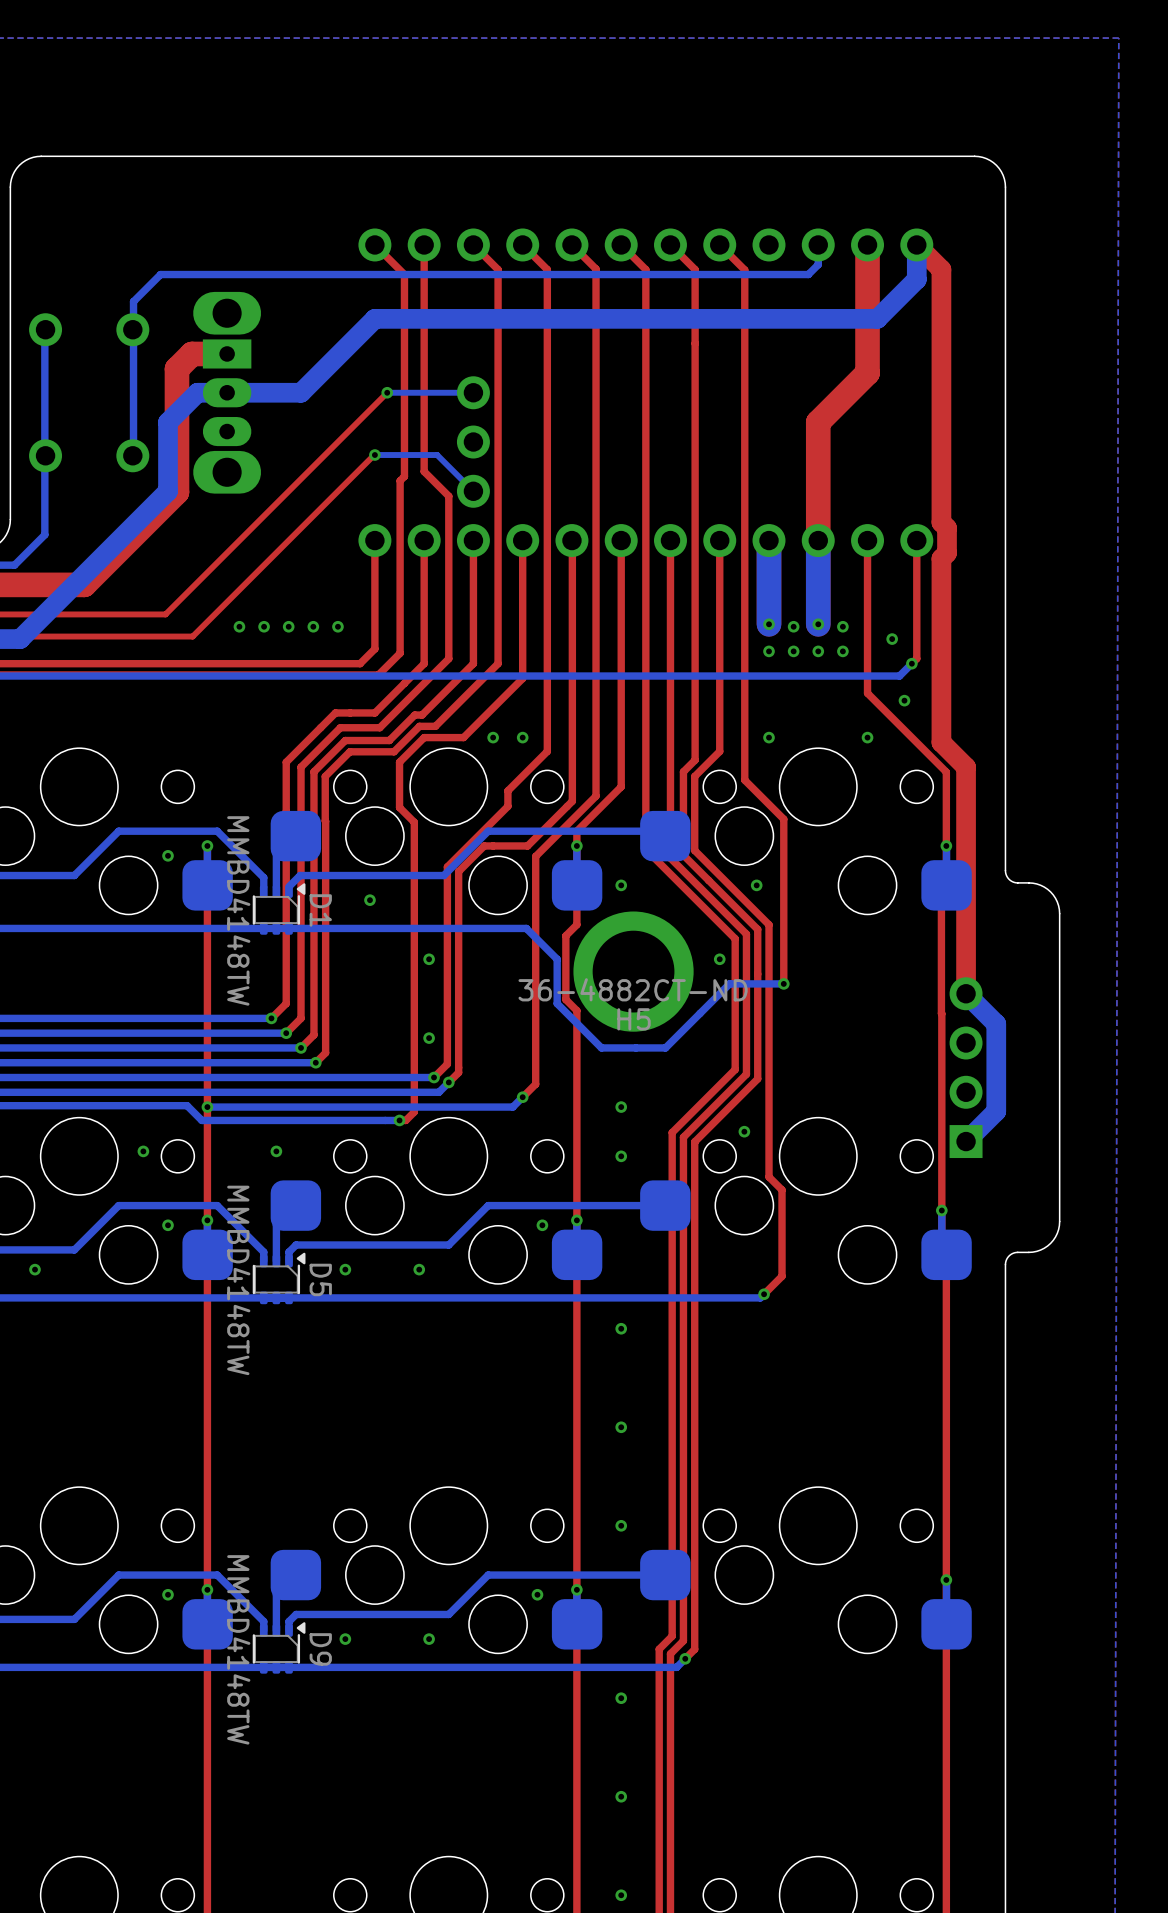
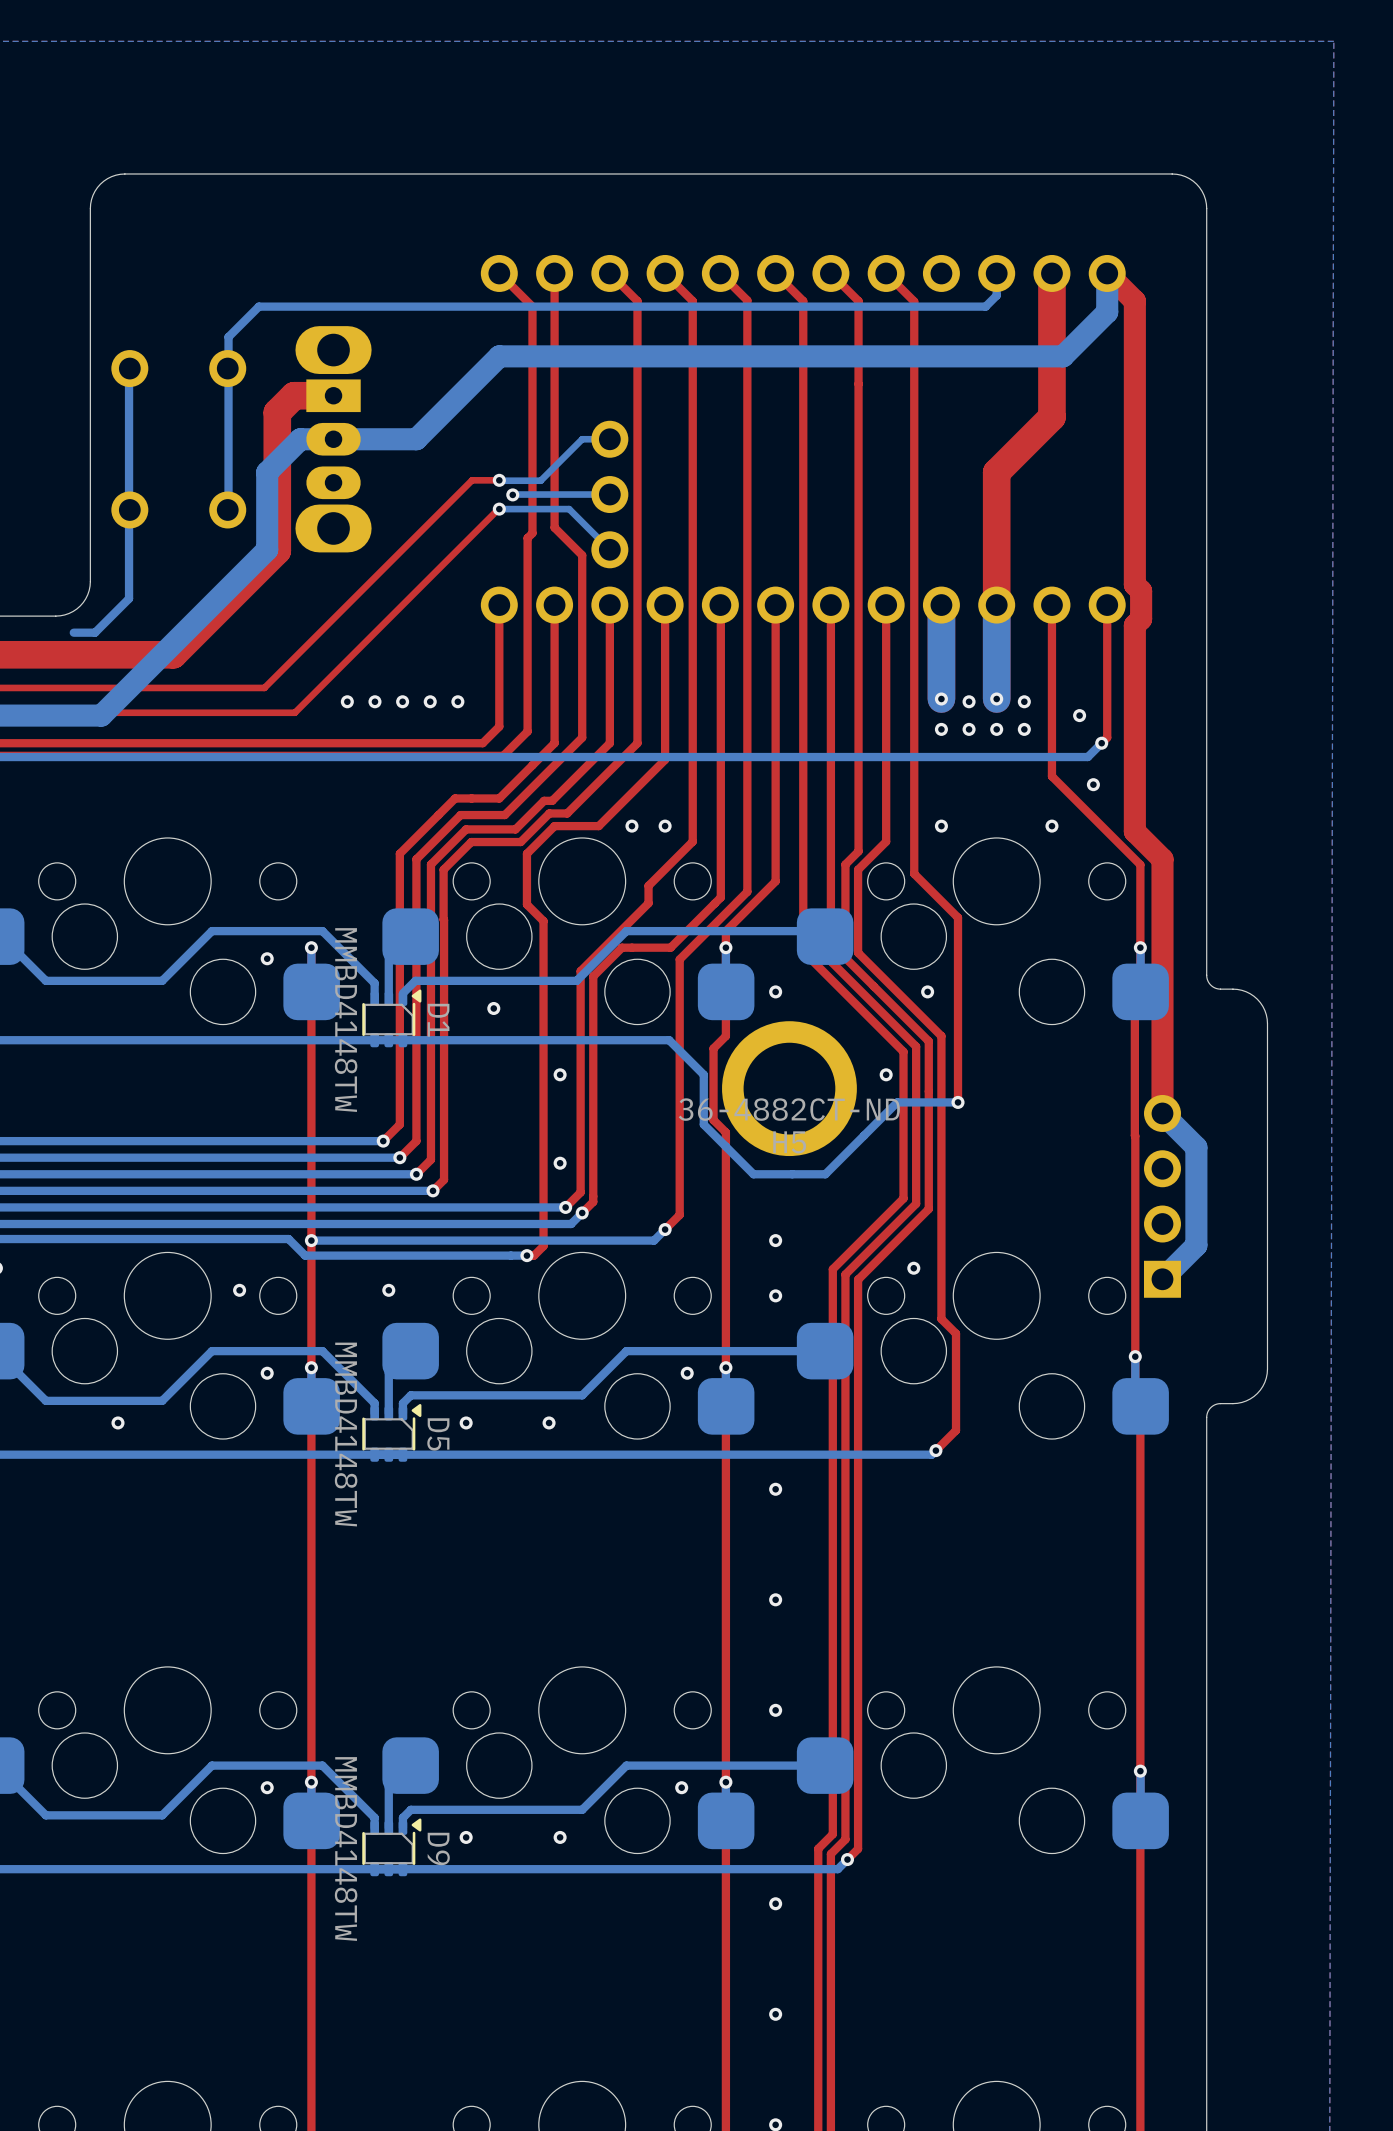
top track: (387, 392) (350, 429) -> (499, 480) (472, 480)
via: (387, 392) -> none
bottom track: (448, 392) (387, 392) -> (582, 439) (540, 480) (499, 480)
via: none -> (499, 480)
via: none -> (512, 494)
bottom track: none -> (609, 494) (512, 494)

